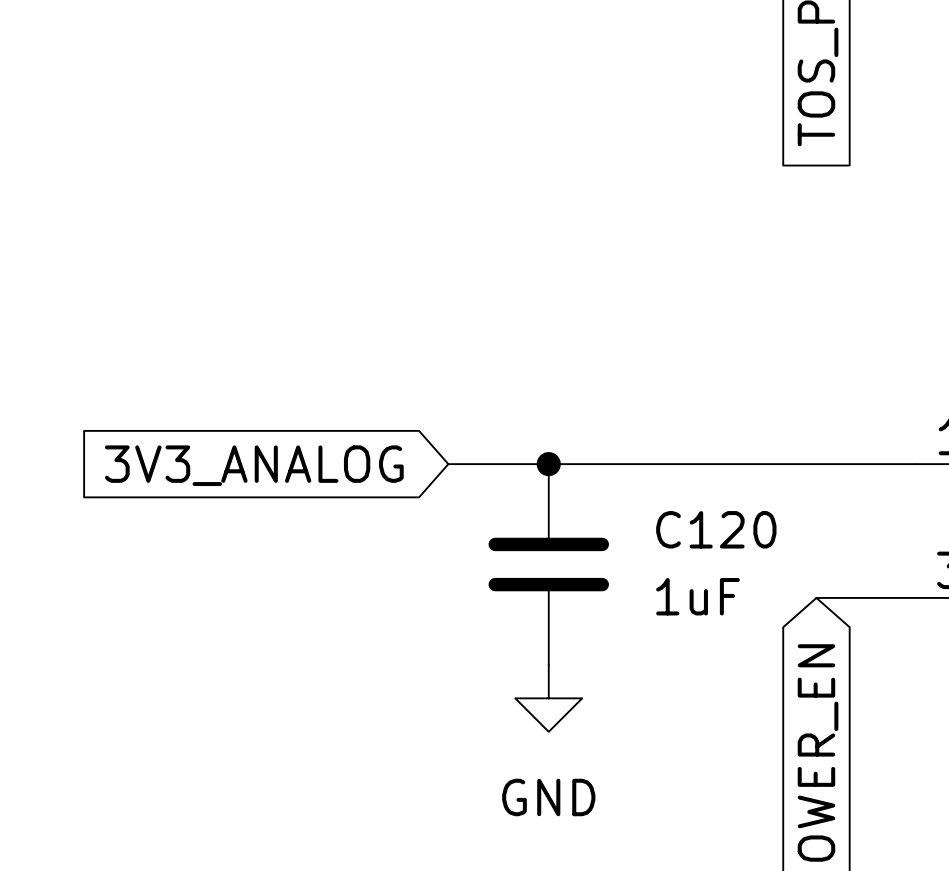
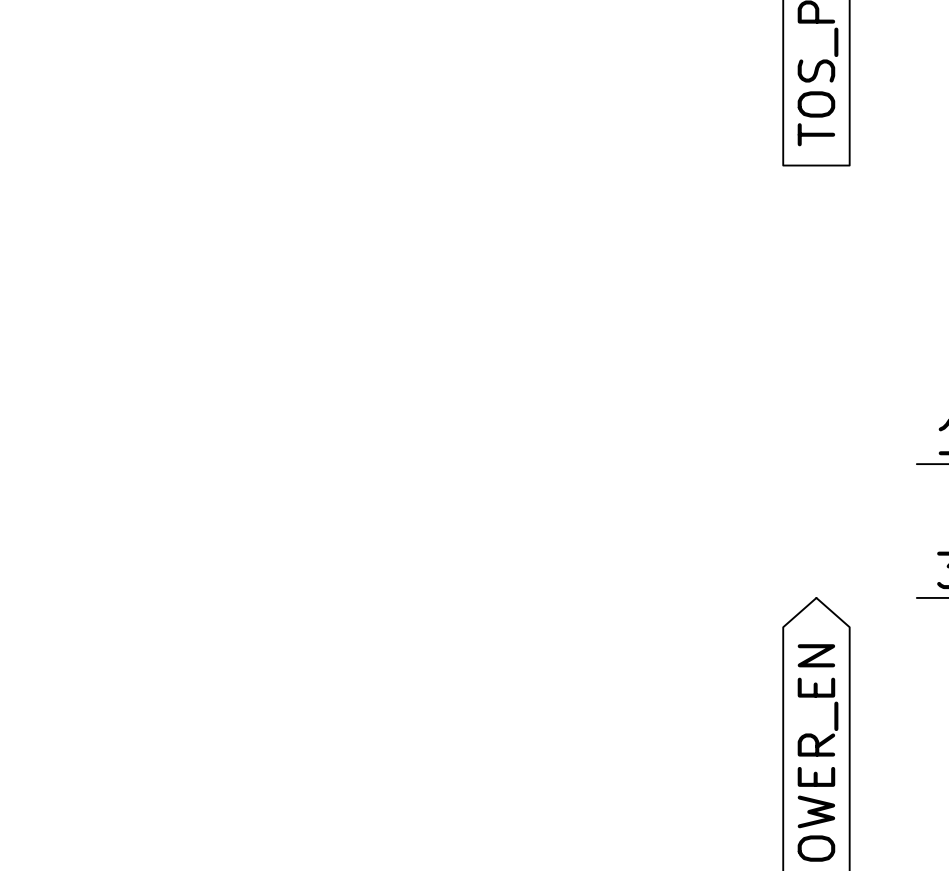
wire: (448, 464) (916, 464) -> none
junction: (548, 464) -> none
global label: 3V3_ANALOG (254, 465) -> none
C120: 1uF (548, 564) -> none
wire: (816, 597) (916, 597) -> none
power symbol: GND (548, 698) -> none

